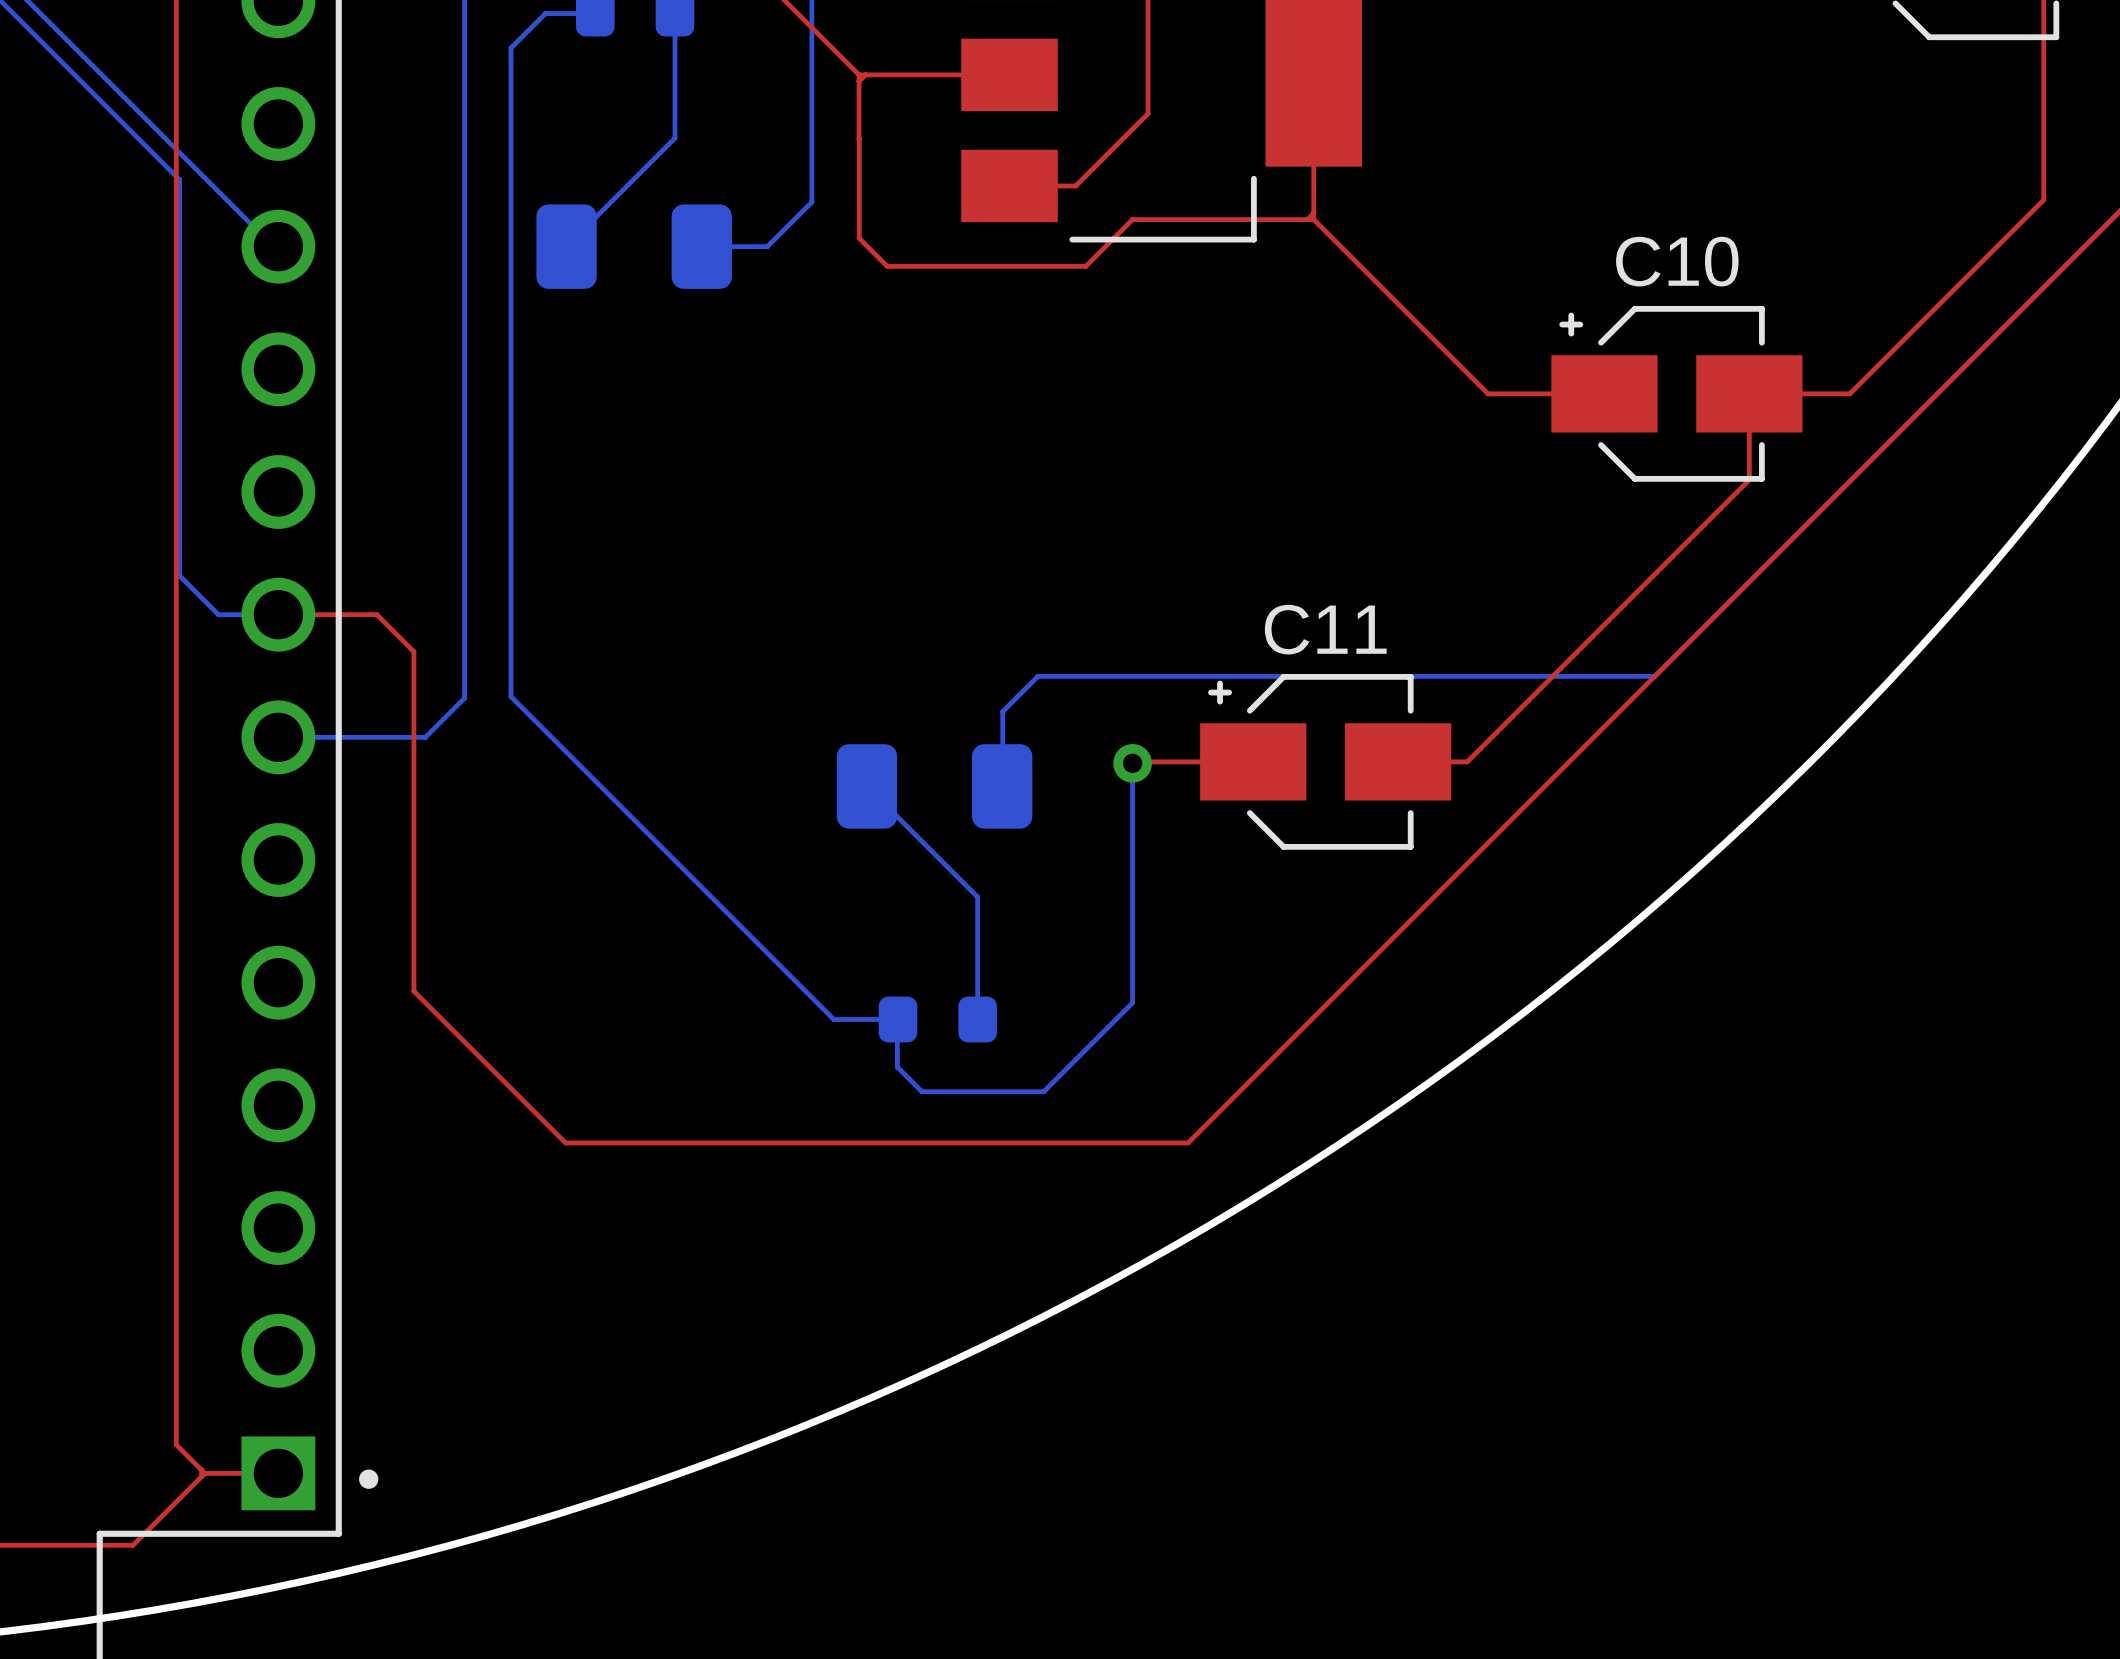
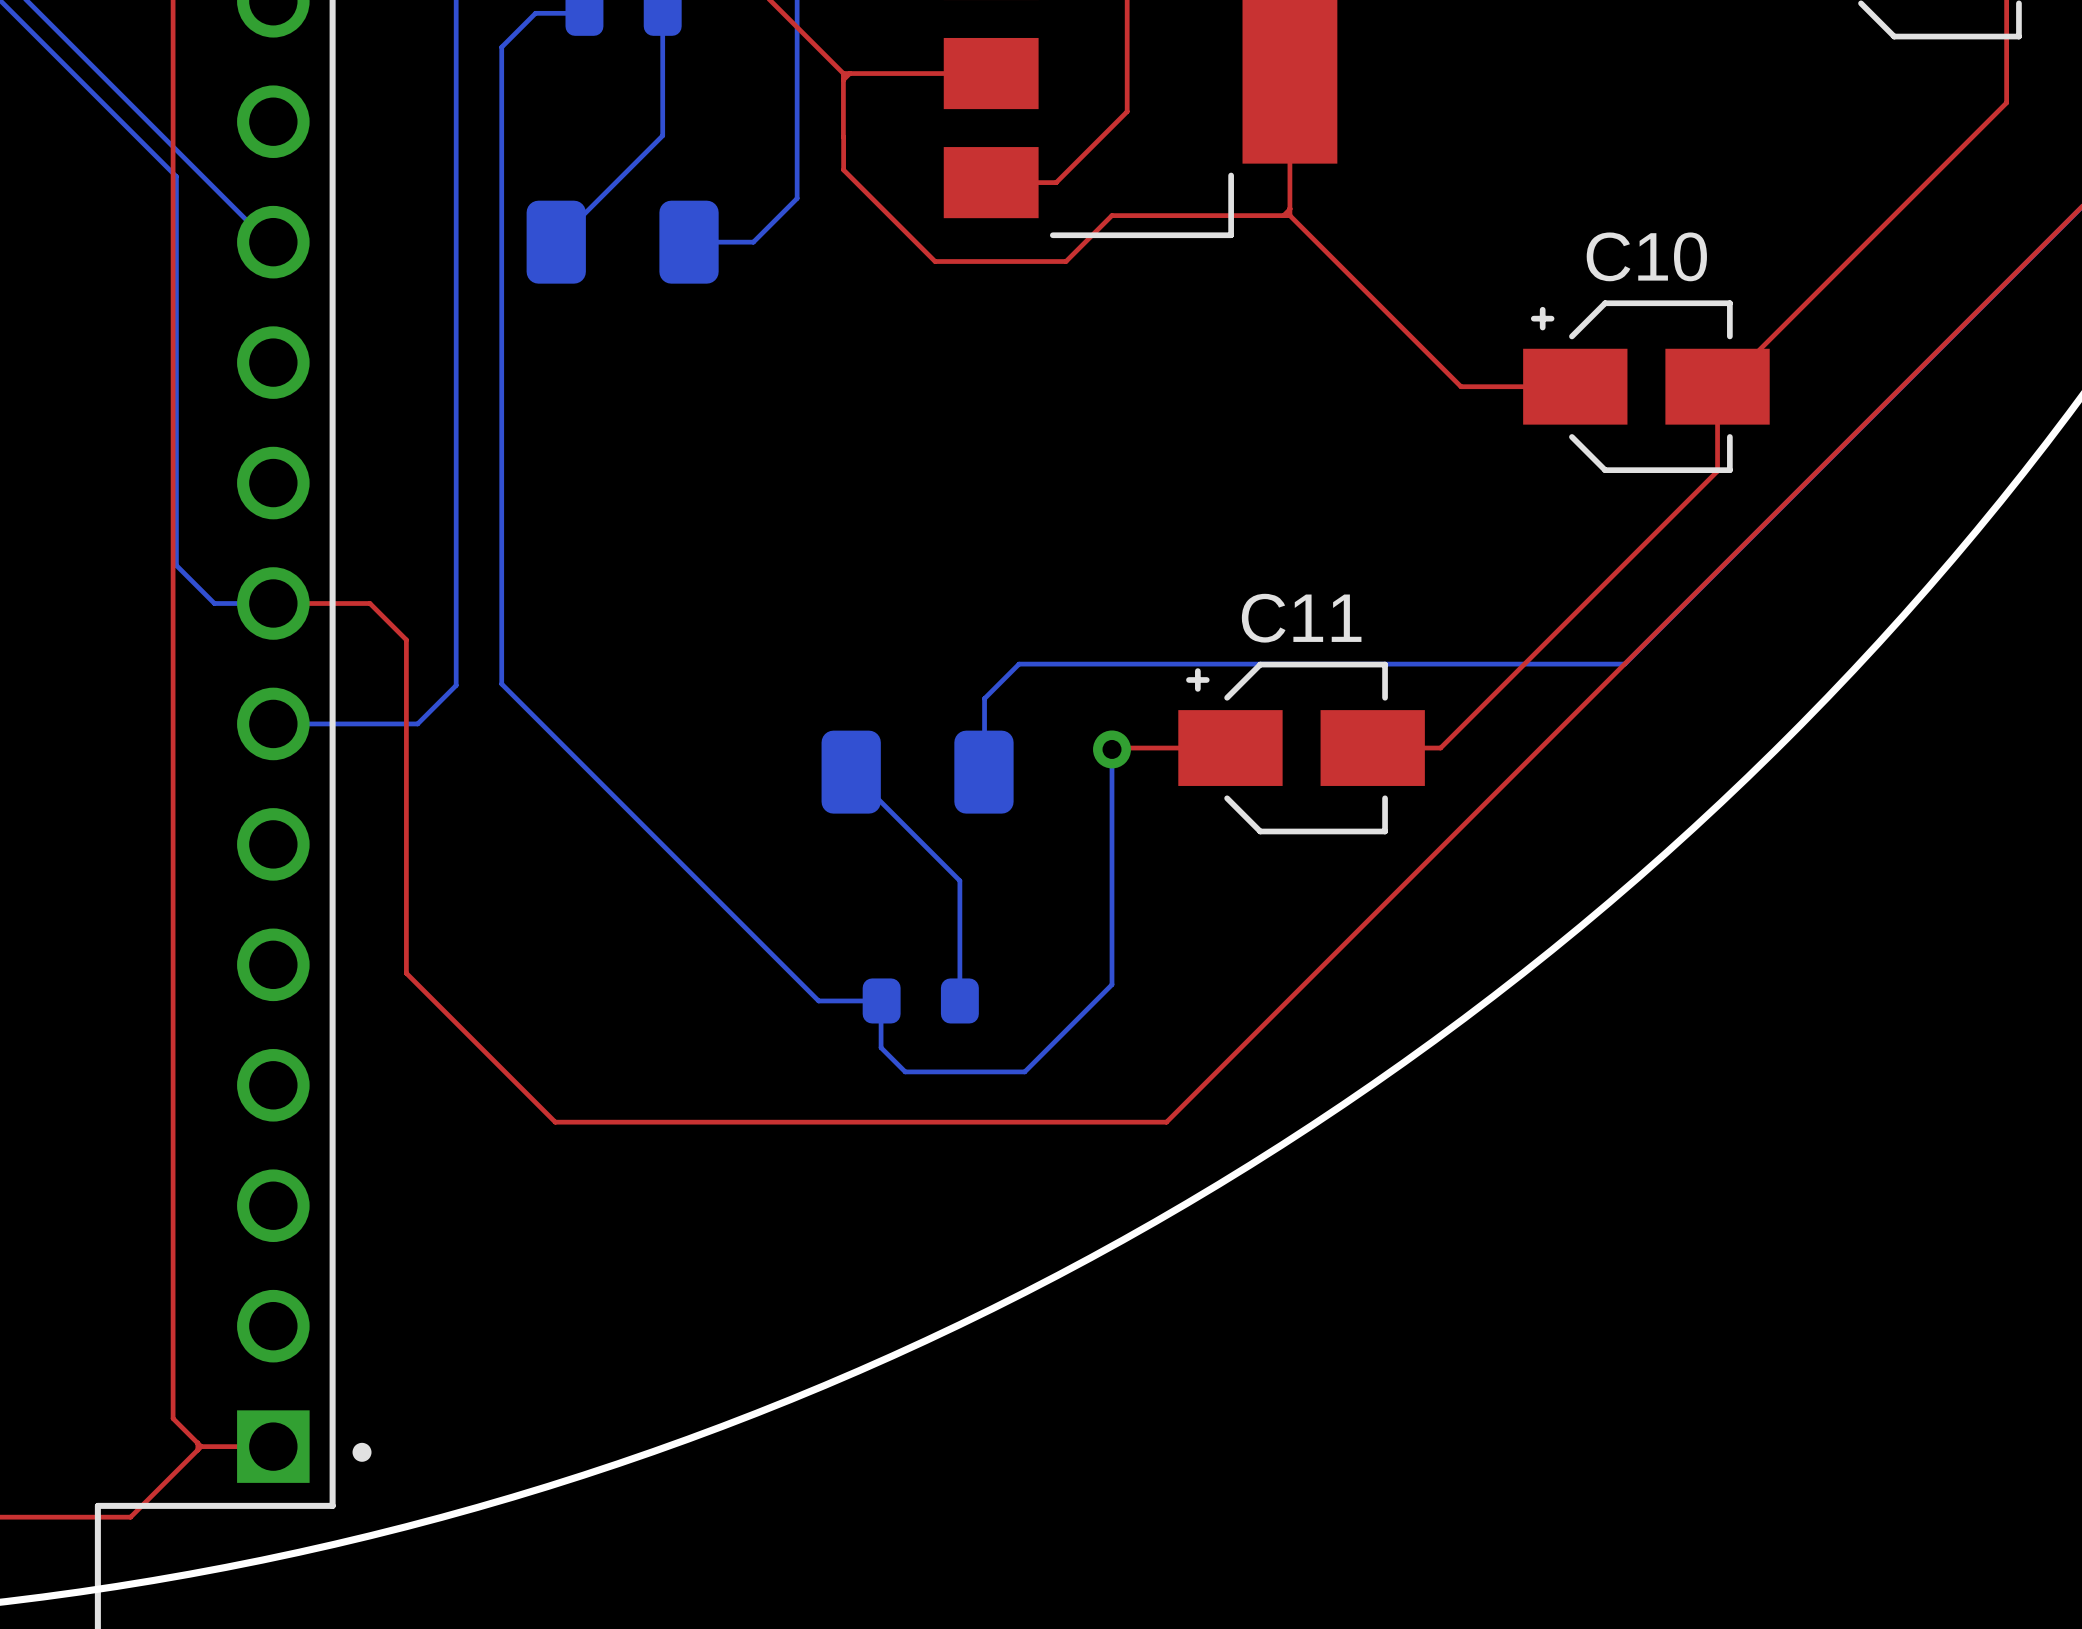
top track: (2043, 104) (2043, 199) (1849, 393) (1754, 393) -> (2006, 102) (1722, 386)
top track: (859, 173) (859, 238) (887, 266) (952, 266) -> (843, 169) (935, 261)

